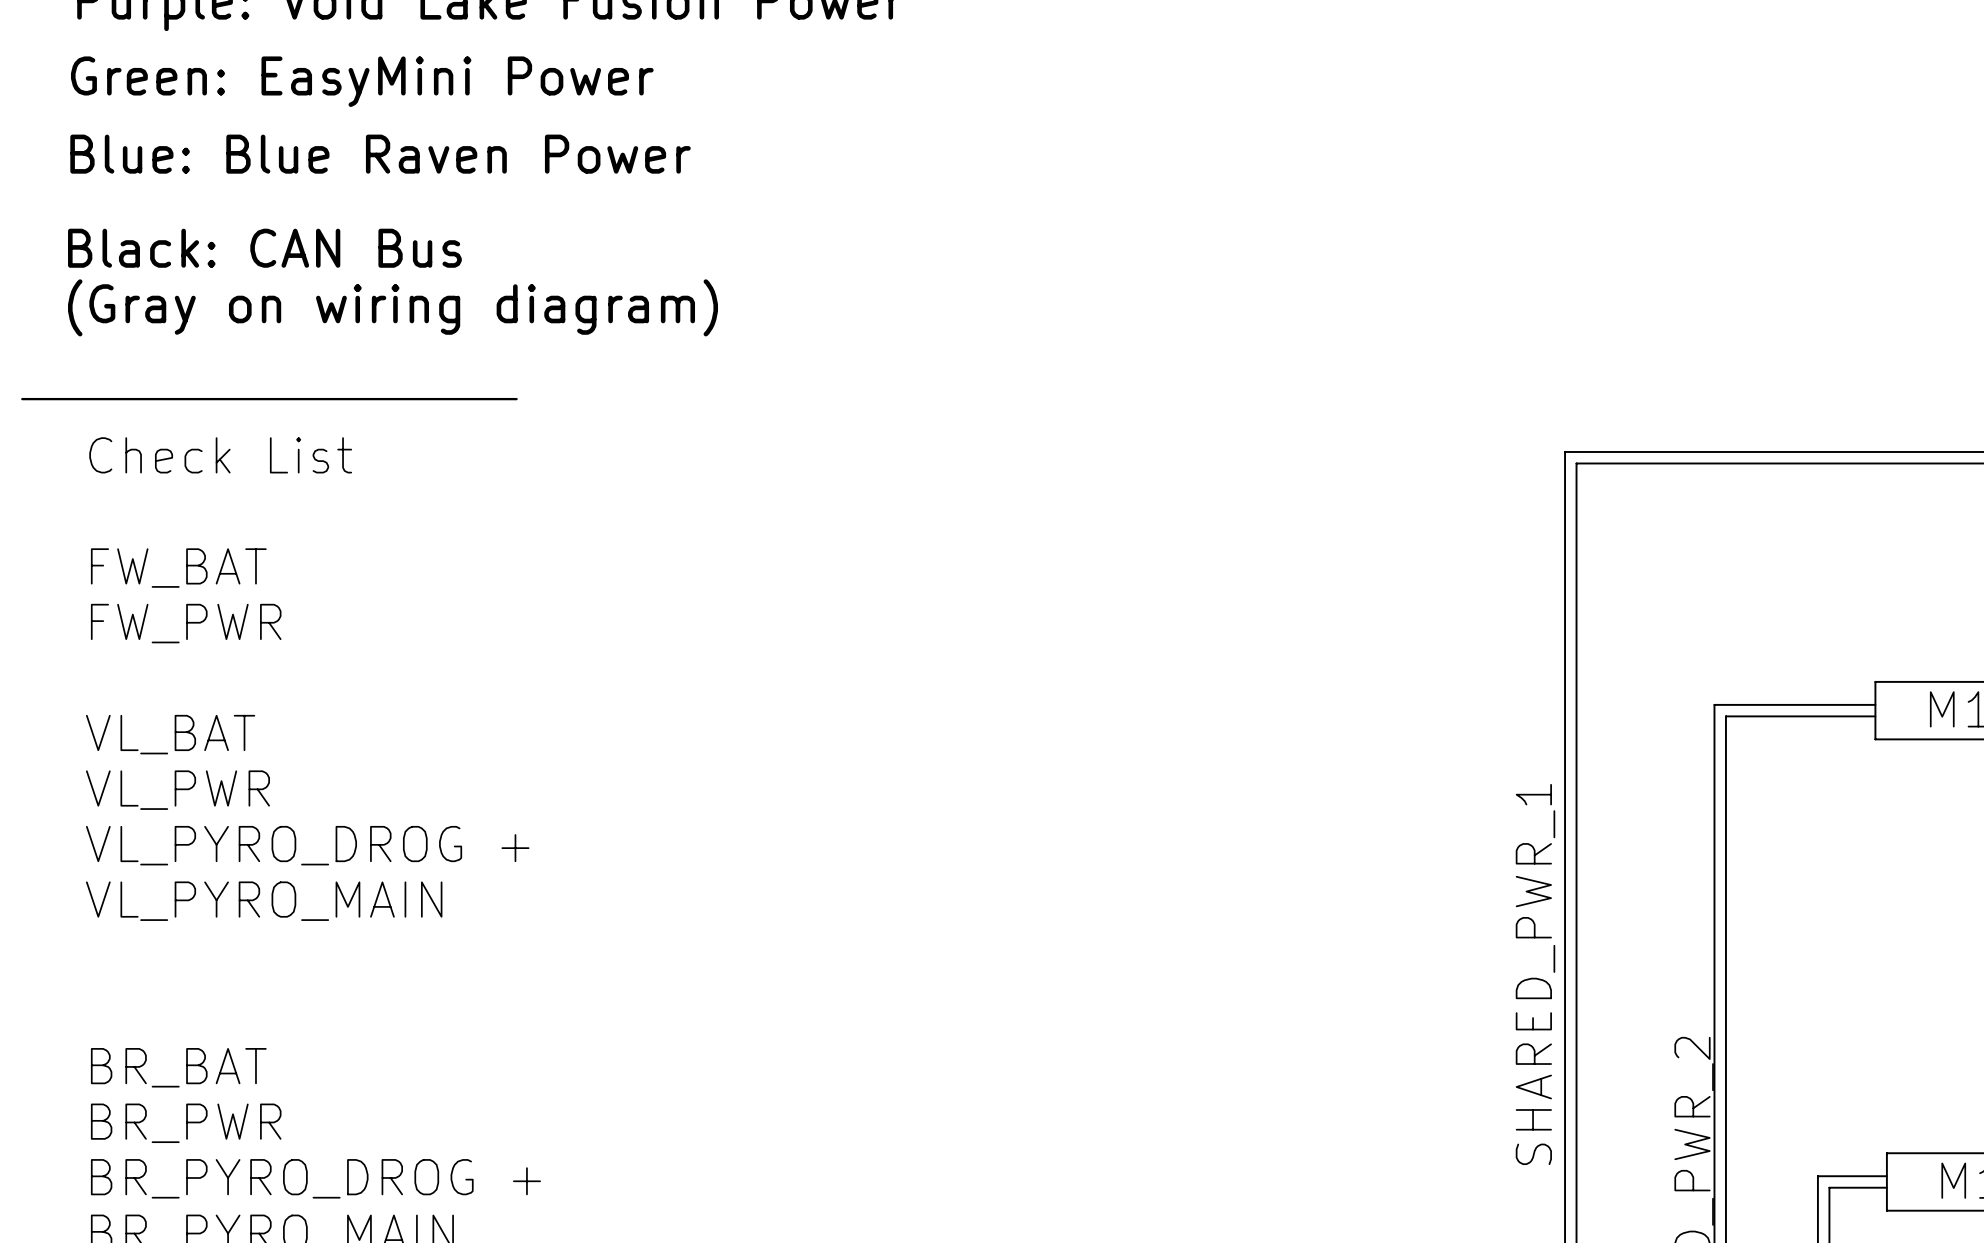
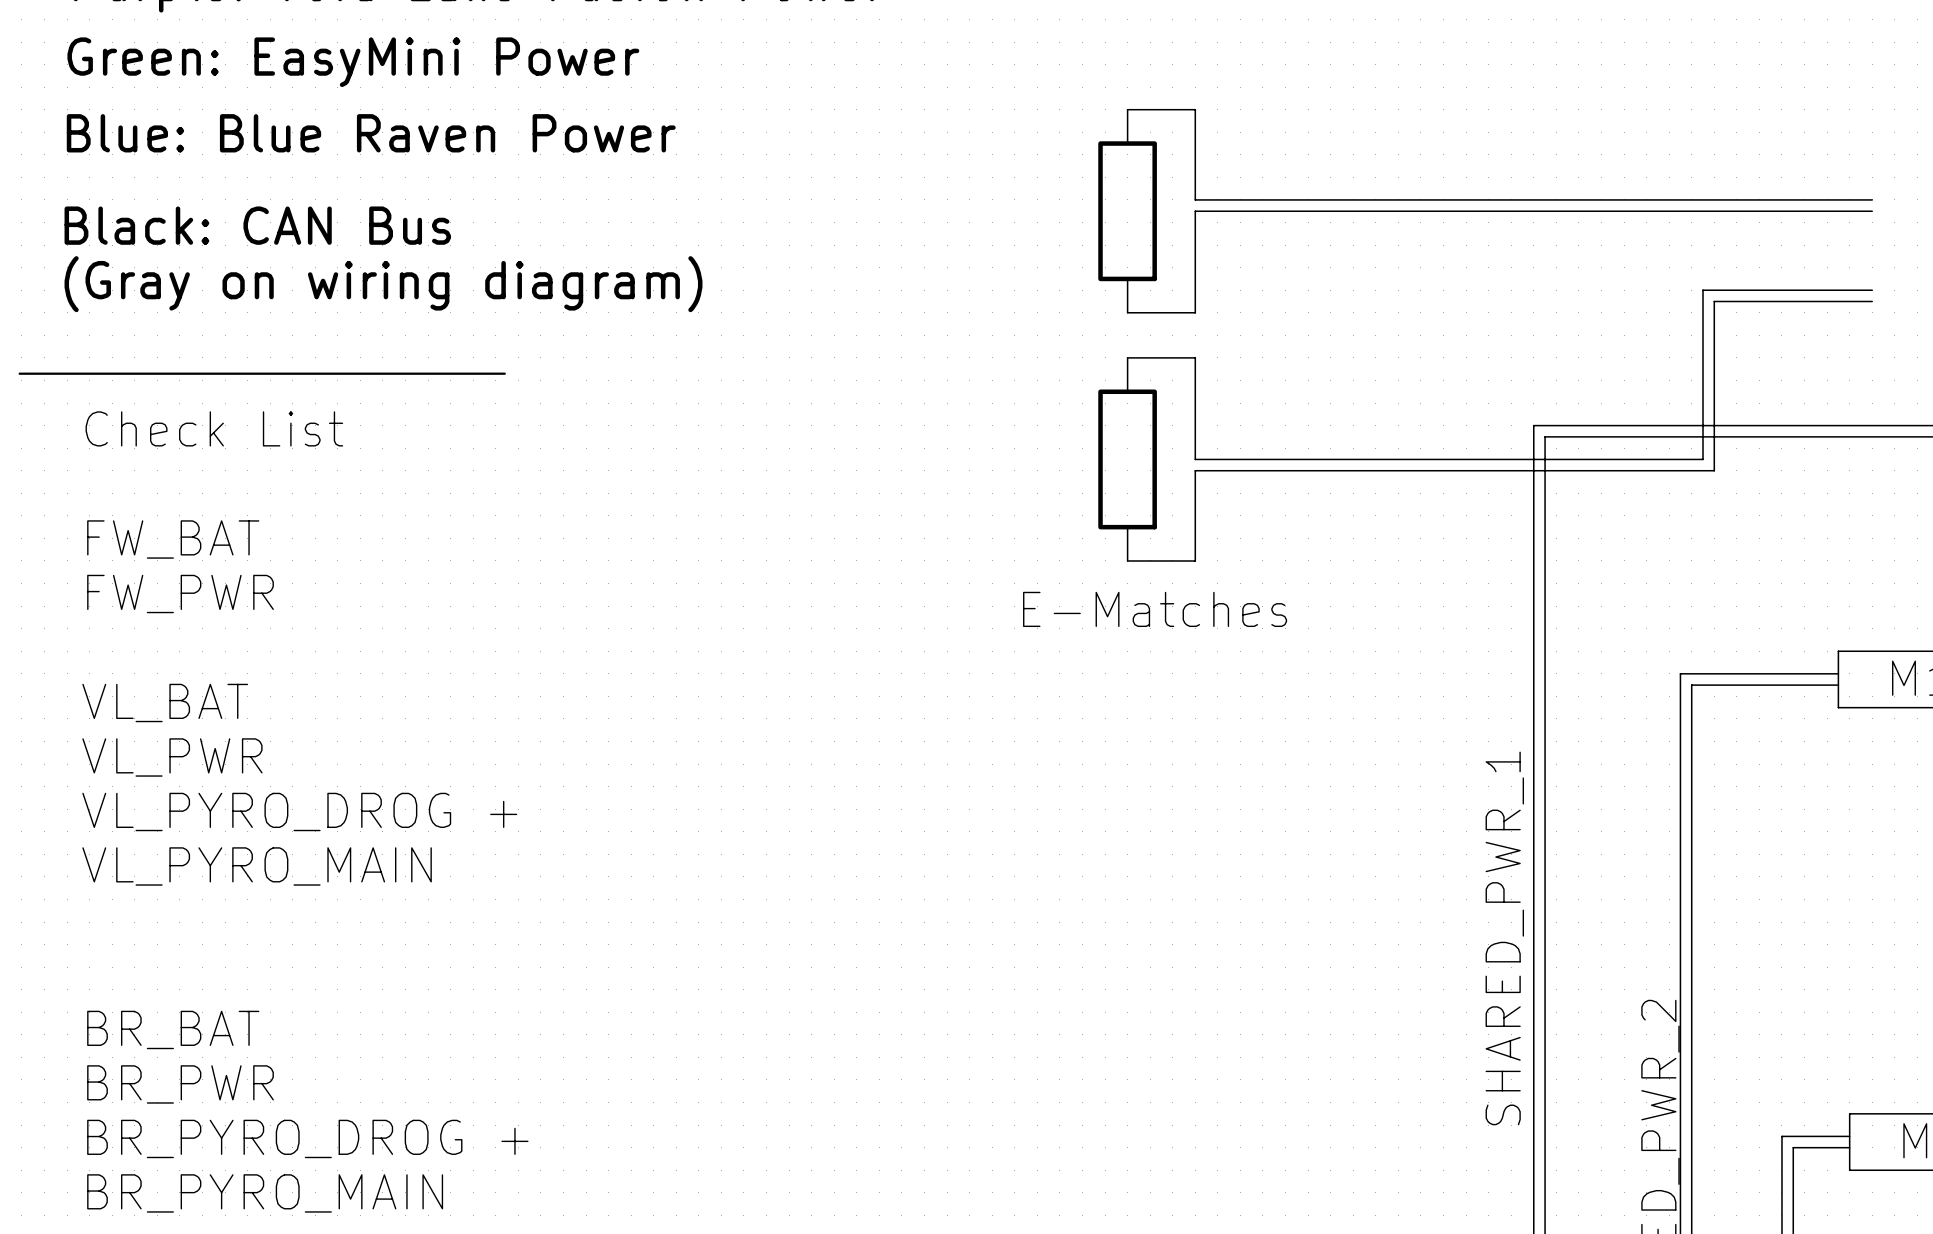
wire: none -> (1127, 109) (1195, 109) (1195, 199) (1872, 199)
part: none -> (1127, 211)
wire: none -> (1872, 211) (1195, 211) (1195, 312) (1127, 312)
wire: none -> (1872, 290) (1703, 290) (1703, 459) (1195, 459) (1195, 357) (1127, 357)
wire: none -> (1872, 301) (1714, 301) (1714, 470) (1195, 470) (1195, 560) (1127, 560)
part: none -> (1127, 459)
text: none -> E-Matches (1155, 609)

